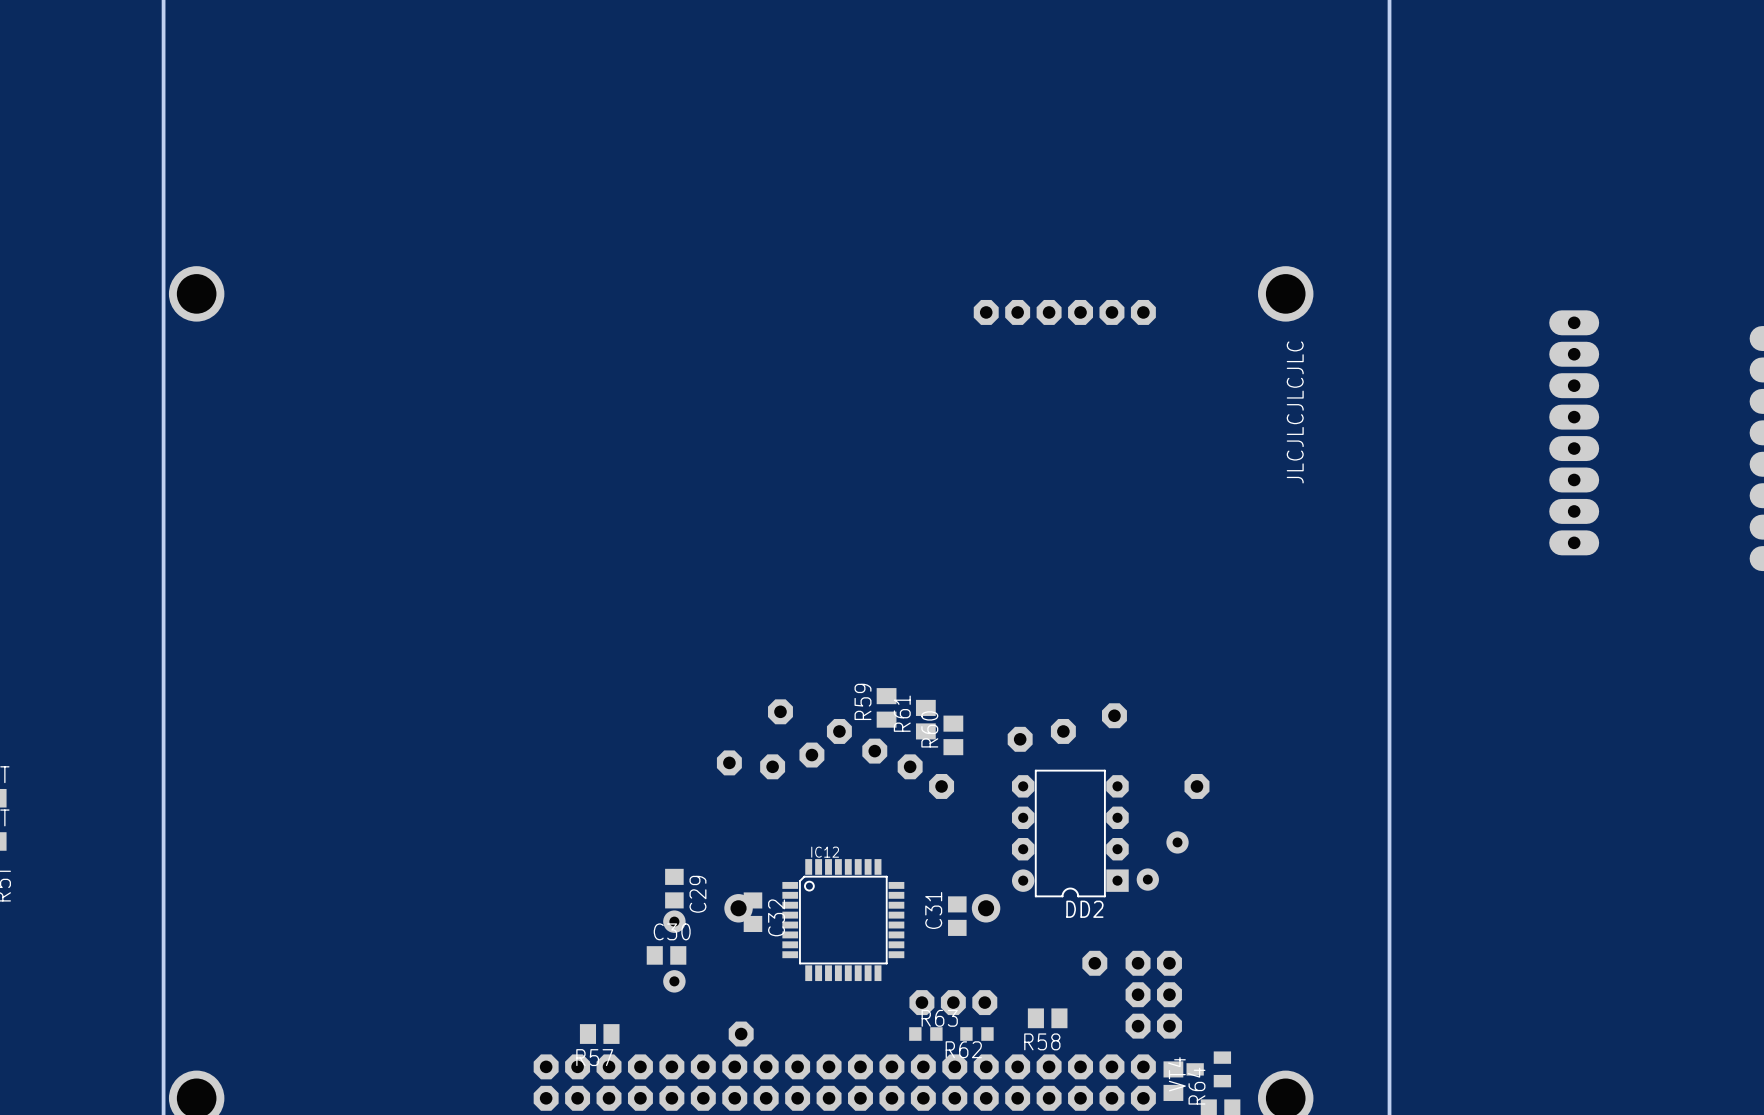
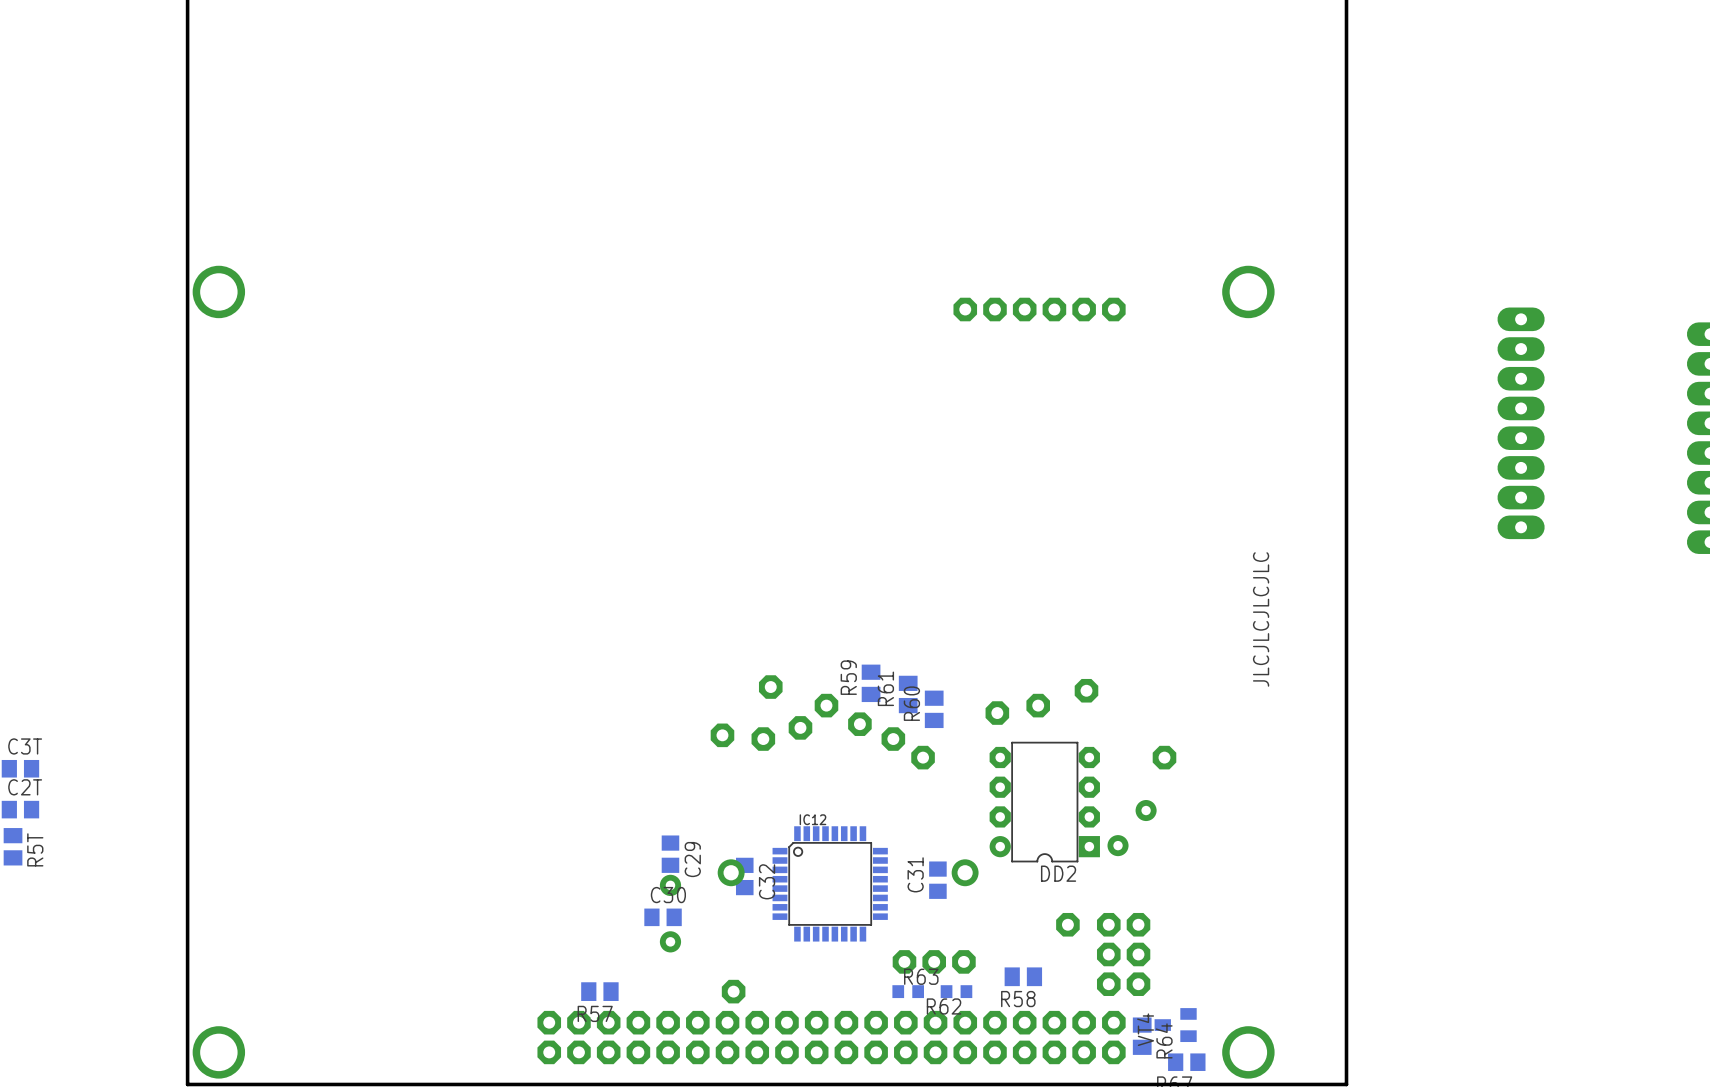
text position: JLCJLCJLCJLC (1295, 412) -> JLCJLCJLCJLC (1261, 619)

